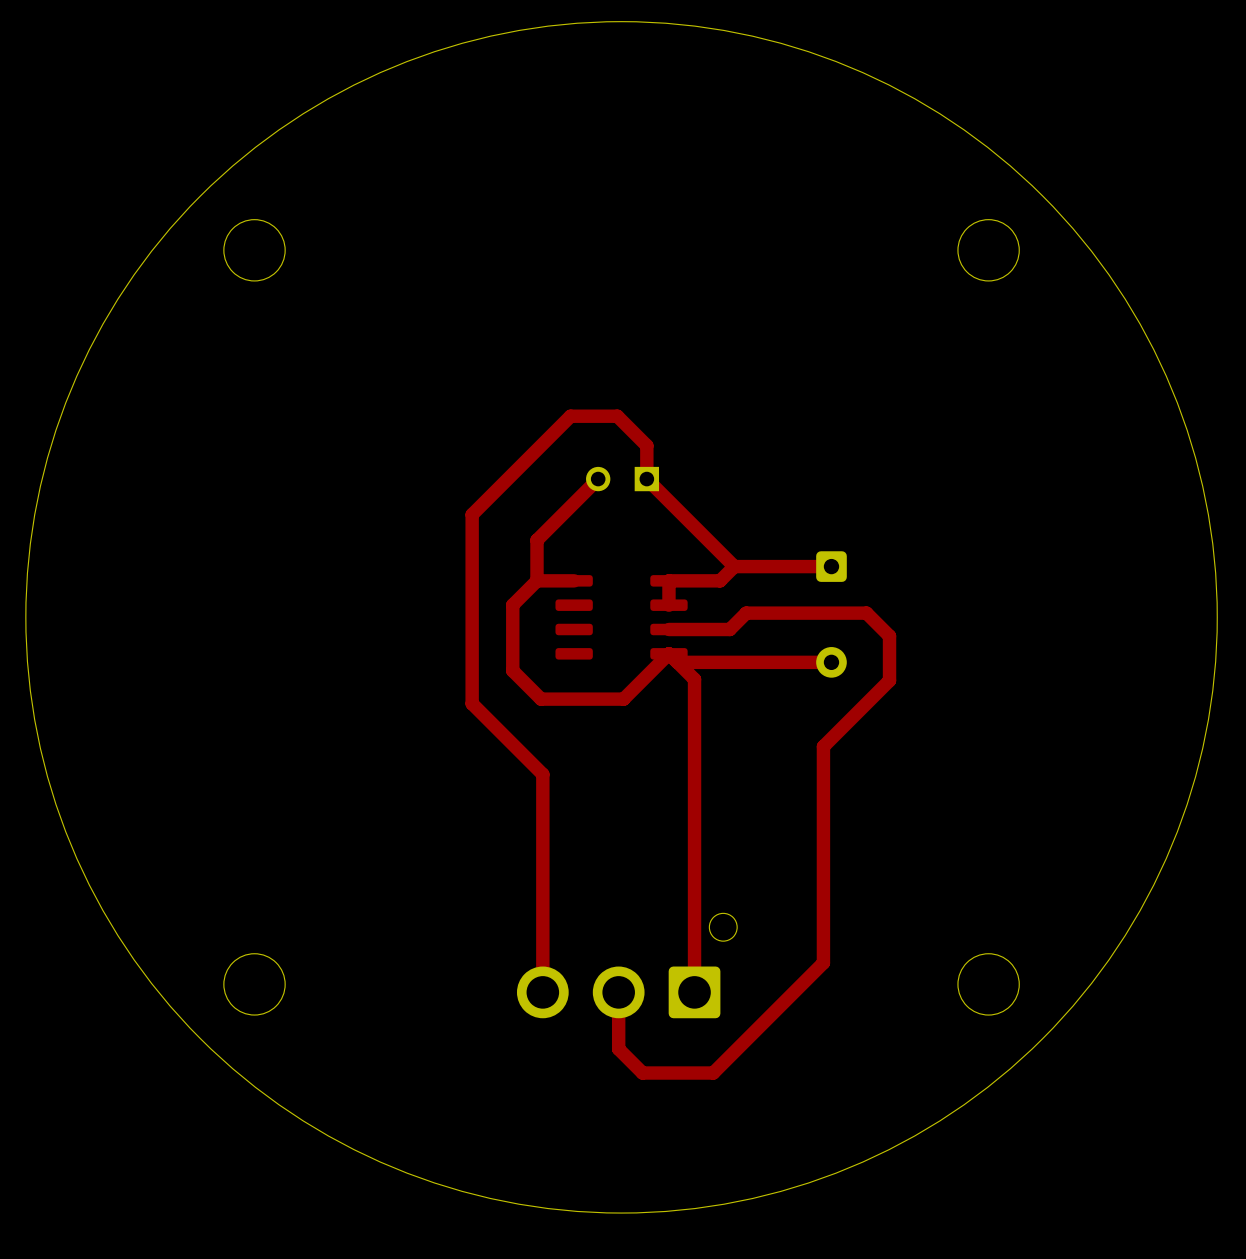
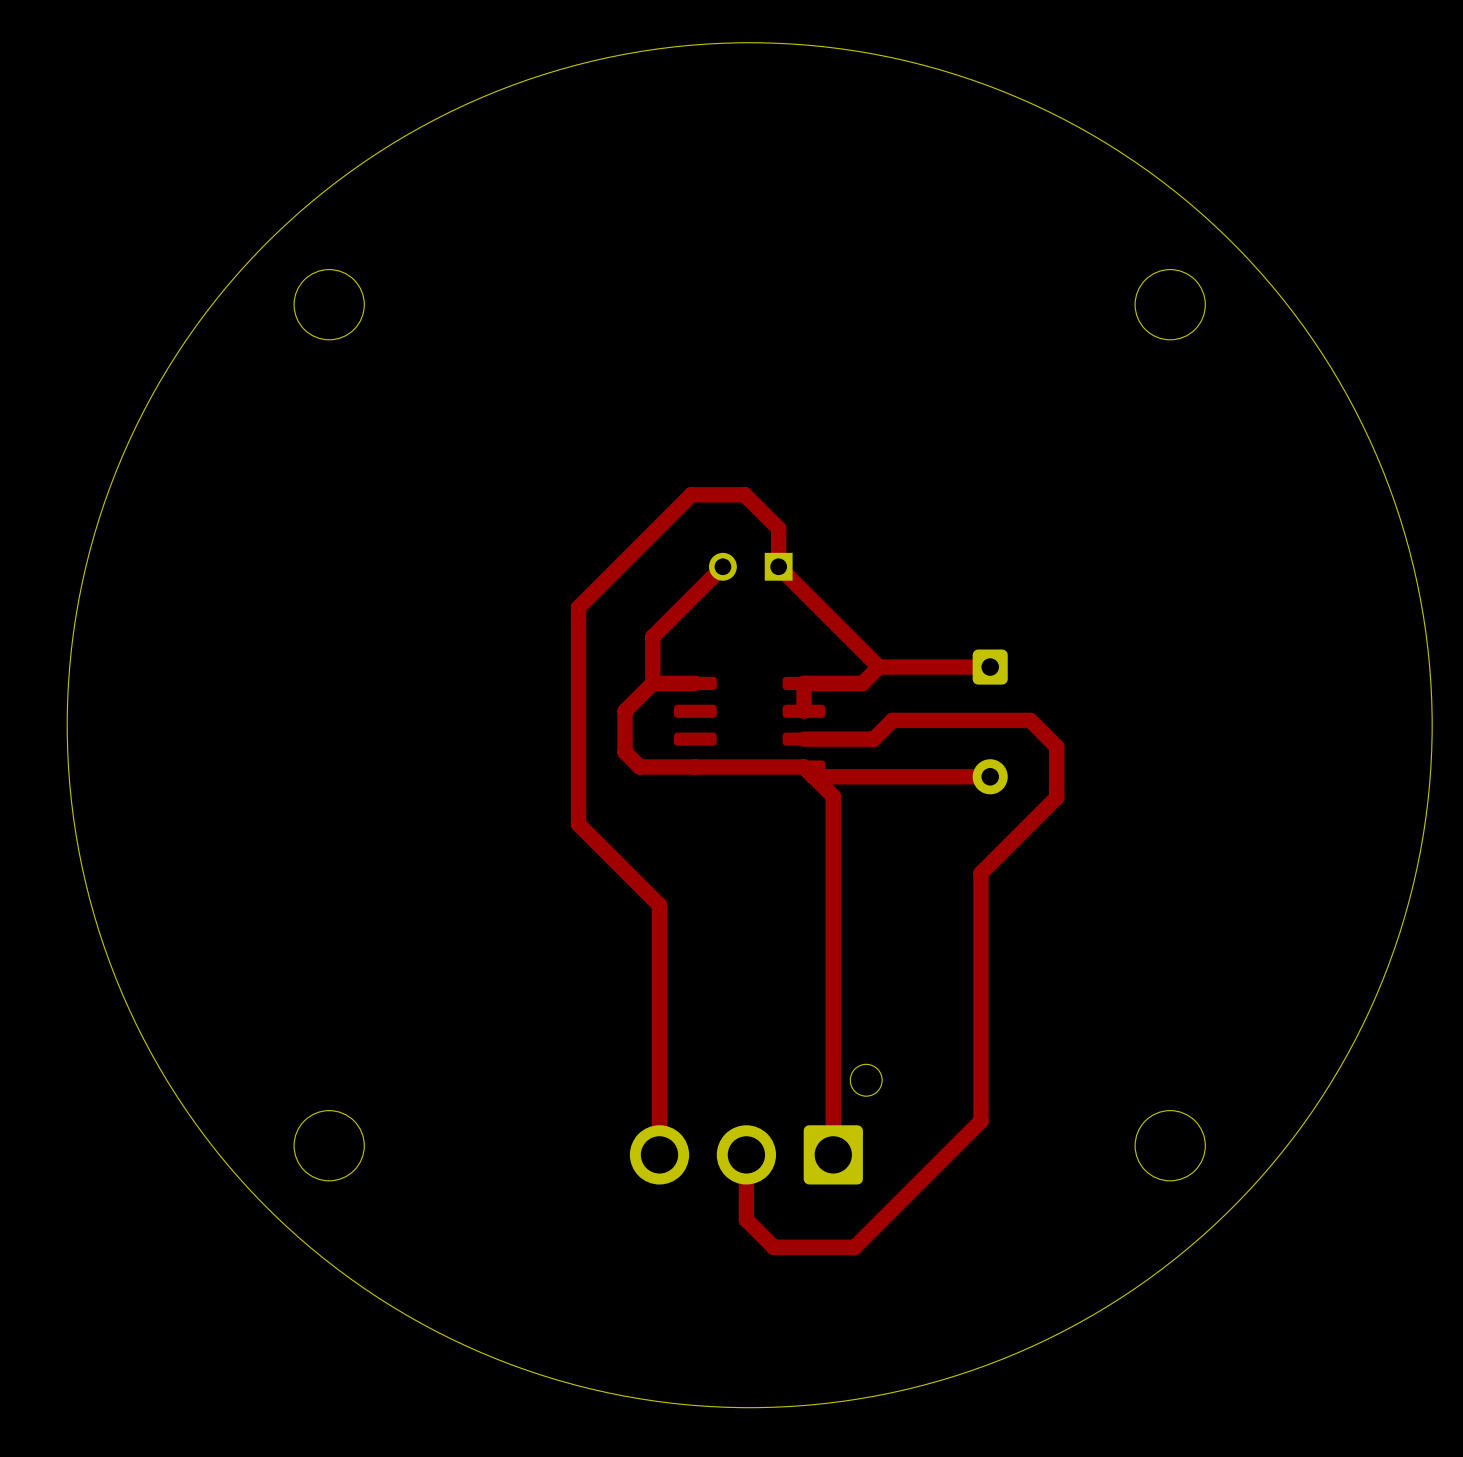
top track: (512, 640) (512, 670) (541, 699) (623, 699) (668, 653) -> (625, 752) (639, 767) (804, 767)

